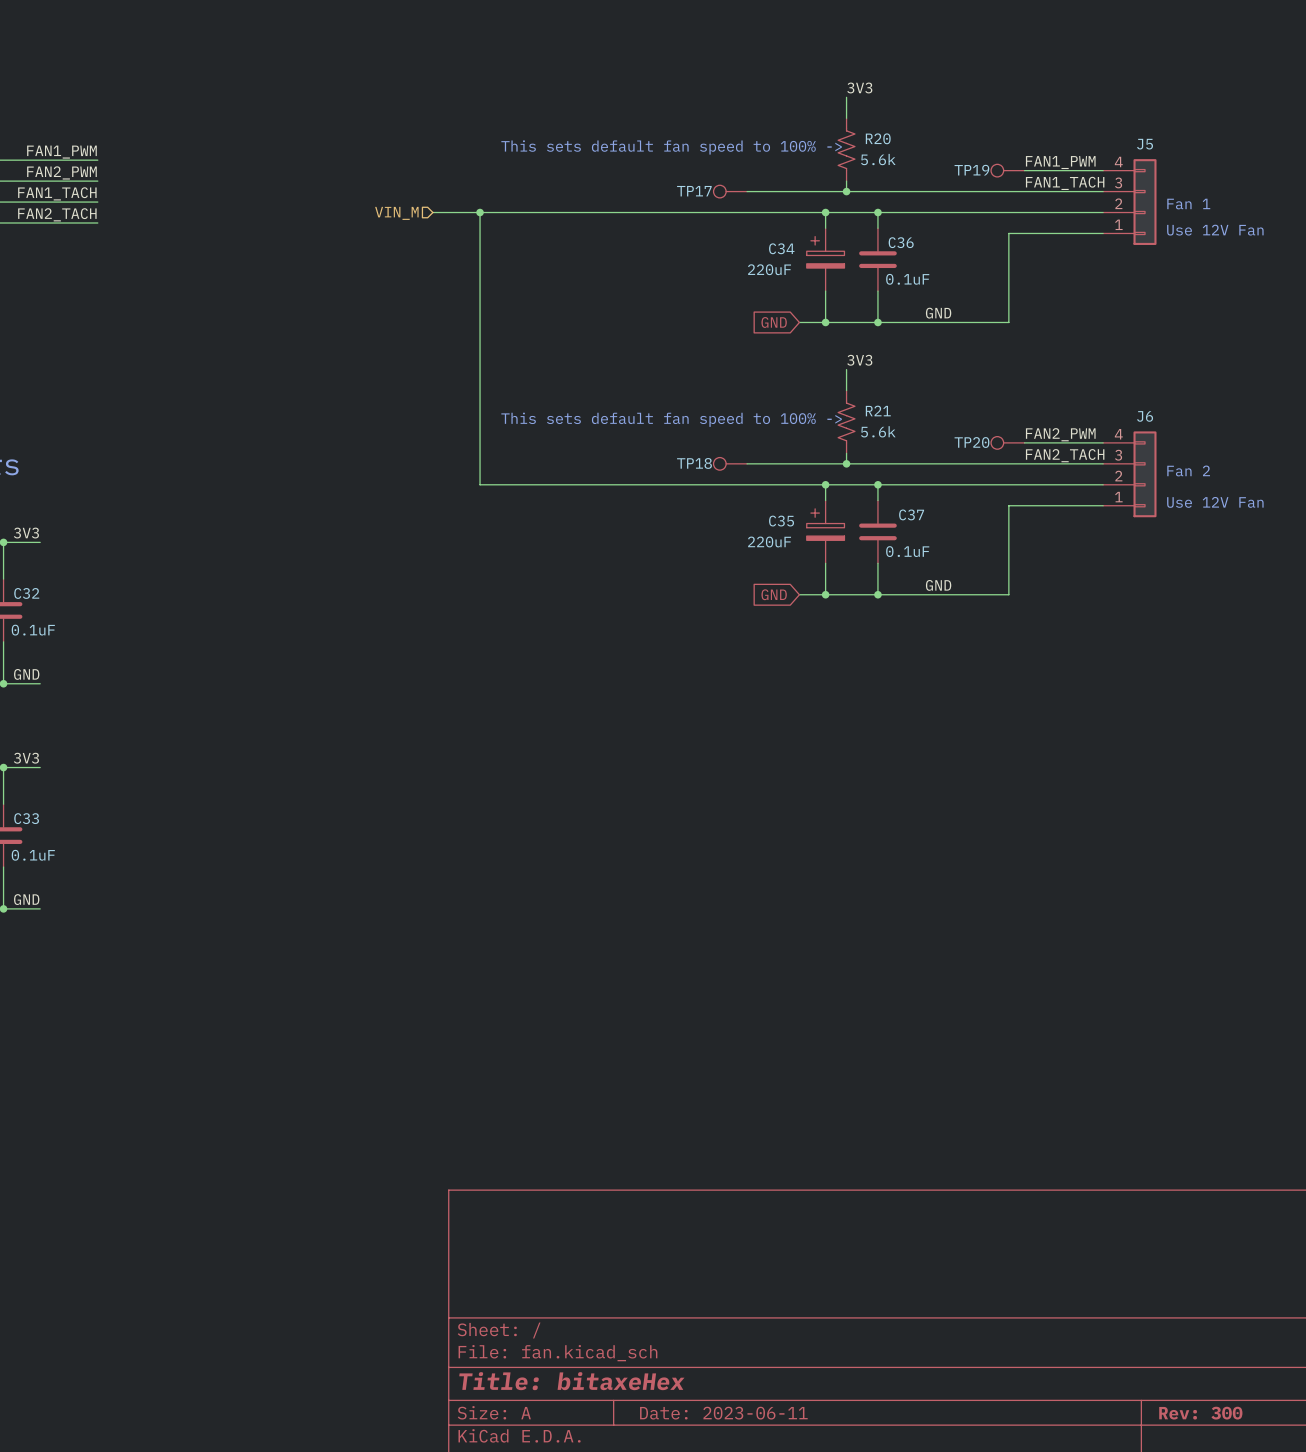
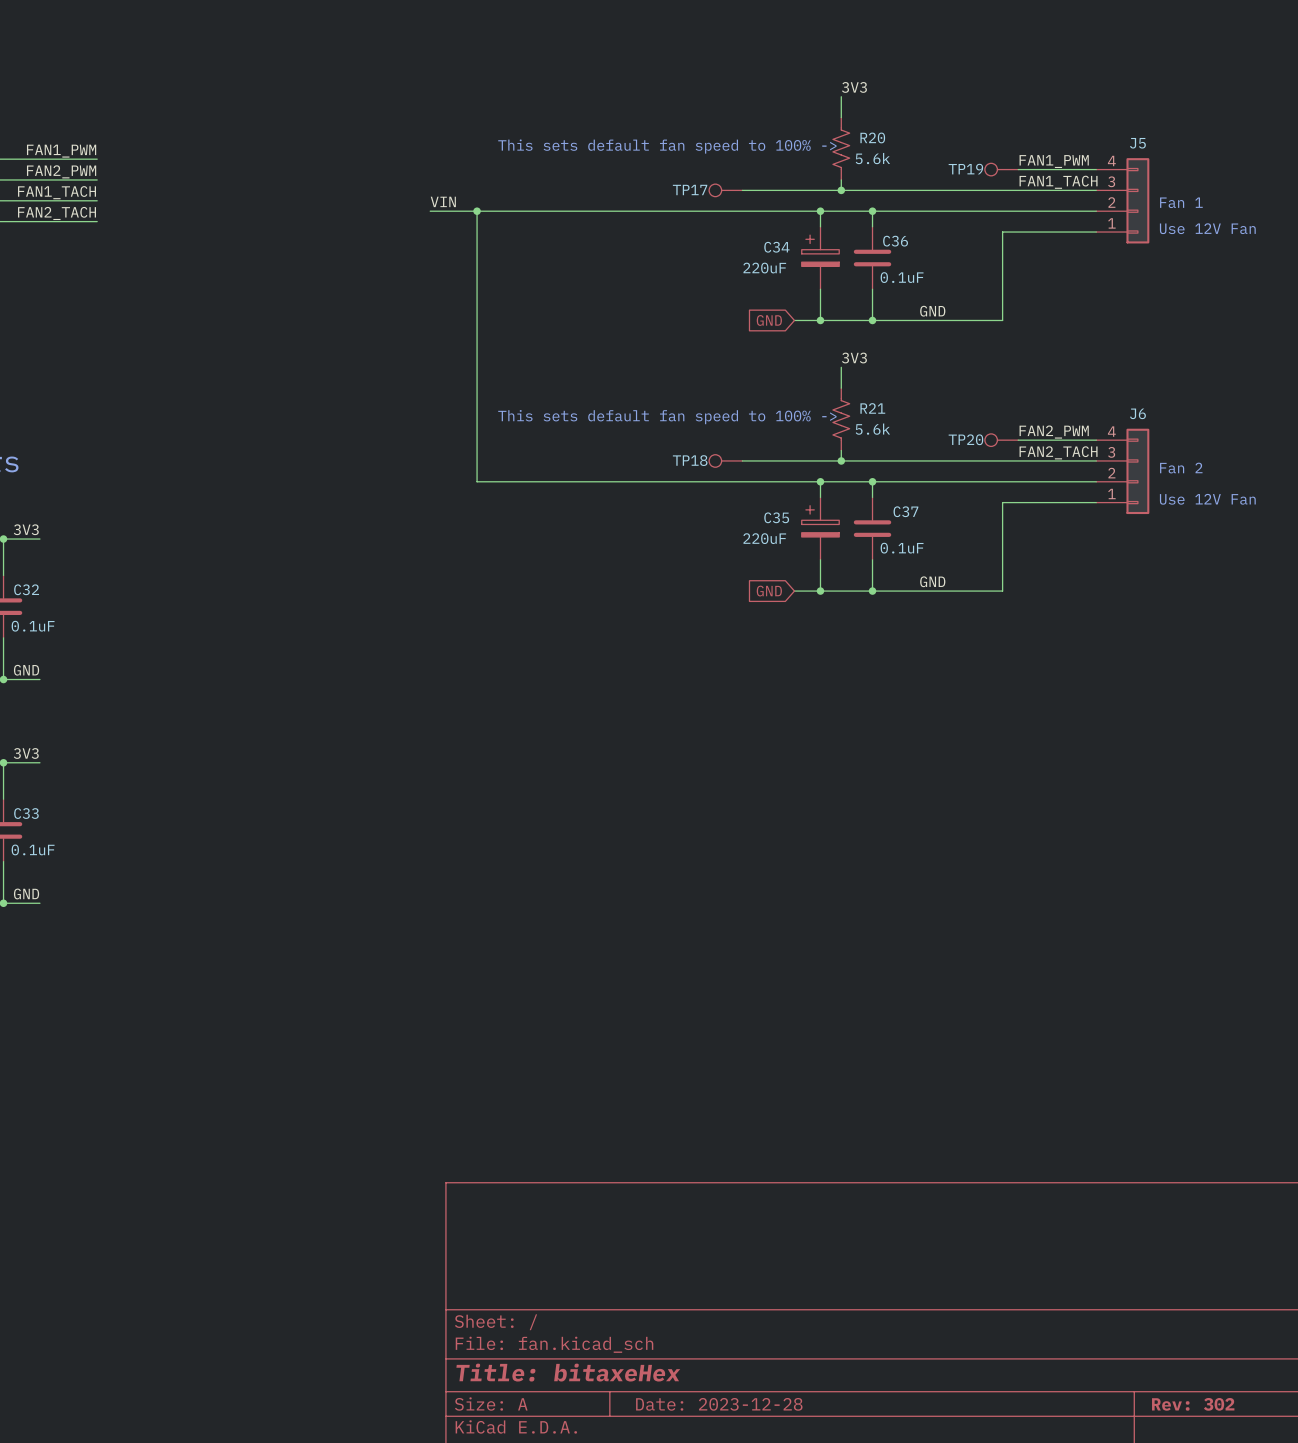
label: none -> VIN (443, 201)
hierarchical label: VIN_M (396, 213) -> none
title block: Date: 2023-06-11 (723, 1413) -> Date: 2023-12-28 (719, 1404)
title block: Rev: 300 (1200, 1413) -> Rev: 302 (1193, 1404)

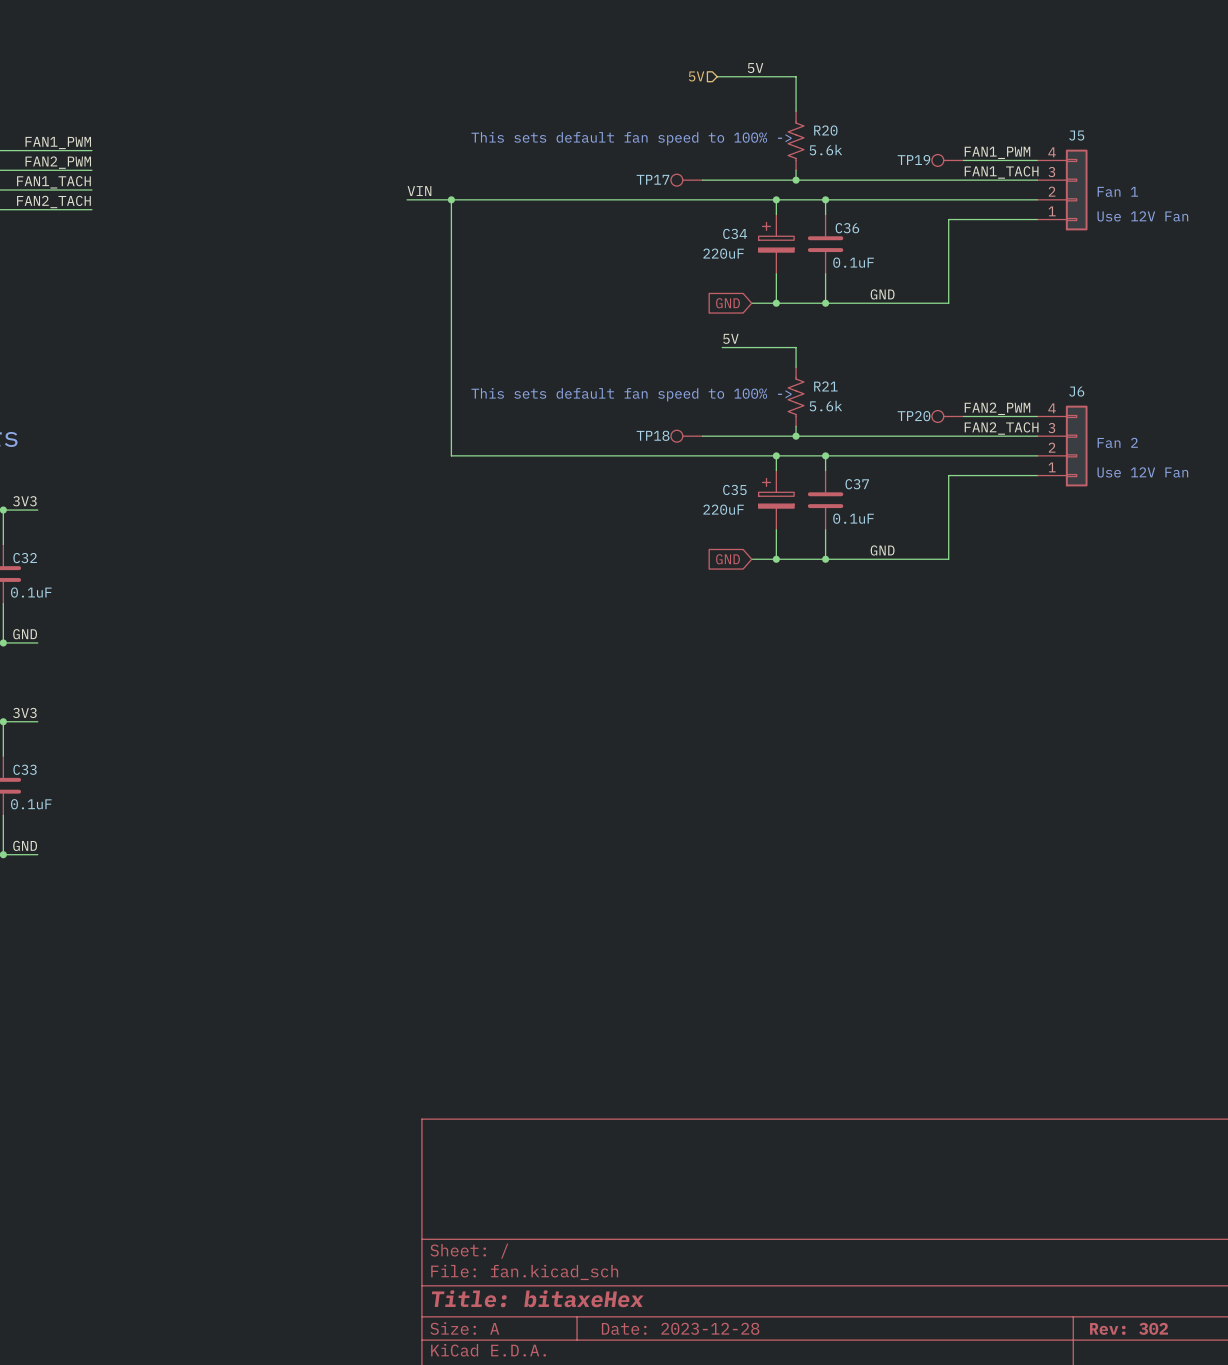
label: none -> 5V (755, 68)
hierarchical label: none -> 5V (696, 76)
wire: none -> (717, 76) (796, 76) (796, 91)
label: 3V3 (854, 87) -> none
label: none -> 5V (730, 338)
label: 3V3 (854, 358) -> none
wire: none -> (722, 347) (796, 347)

